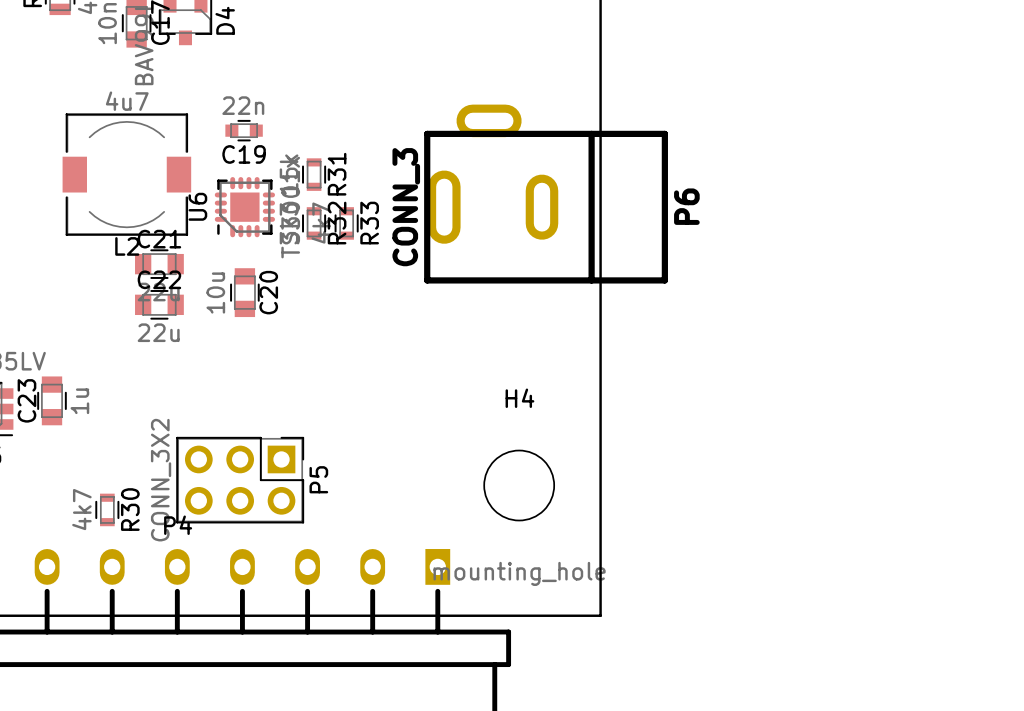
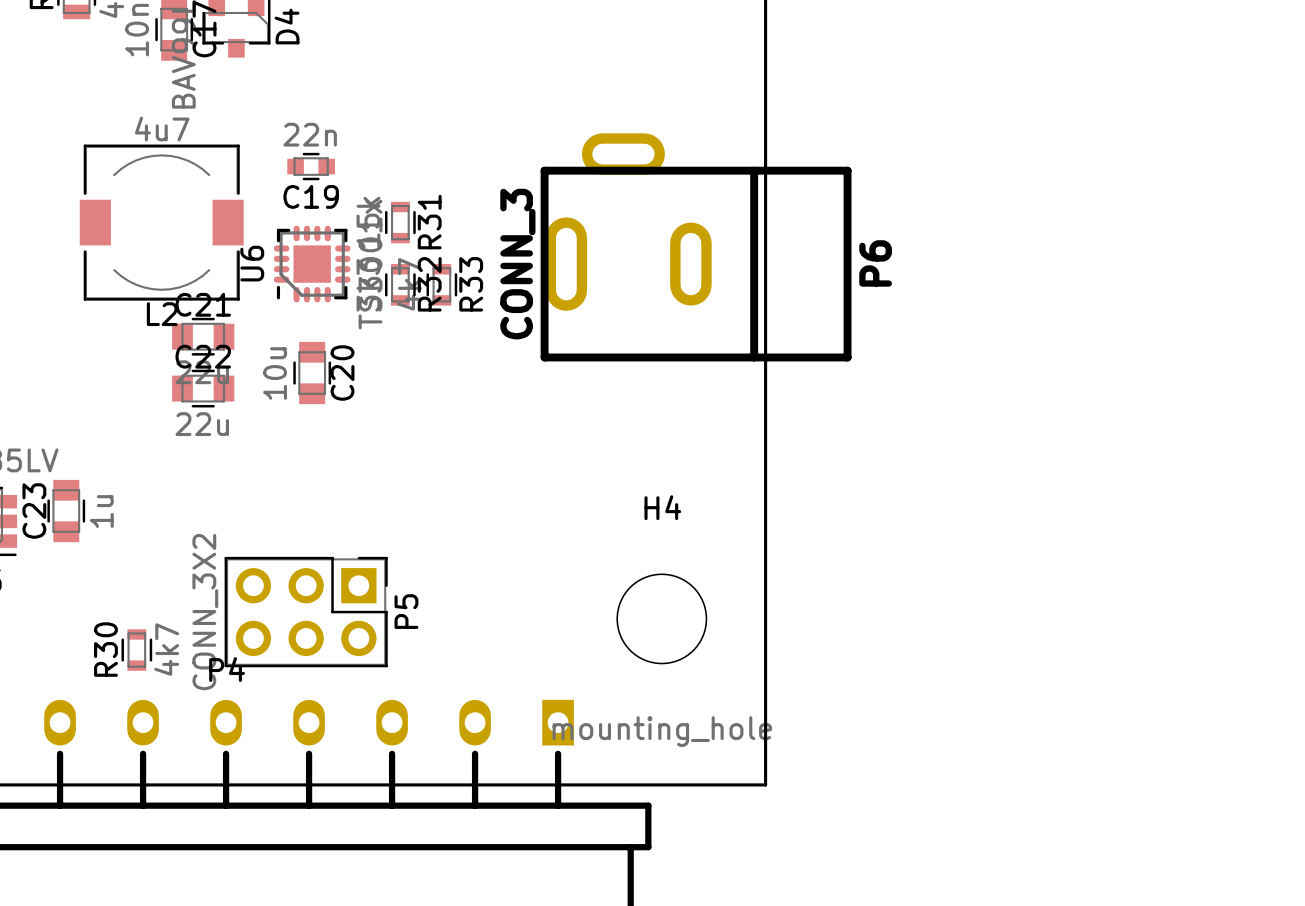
R30 value position: 4k7 (81, 509) -> 4k7 (166, 649)
R30 name position: R30 (130, 509) -> R30 (105, 649)

